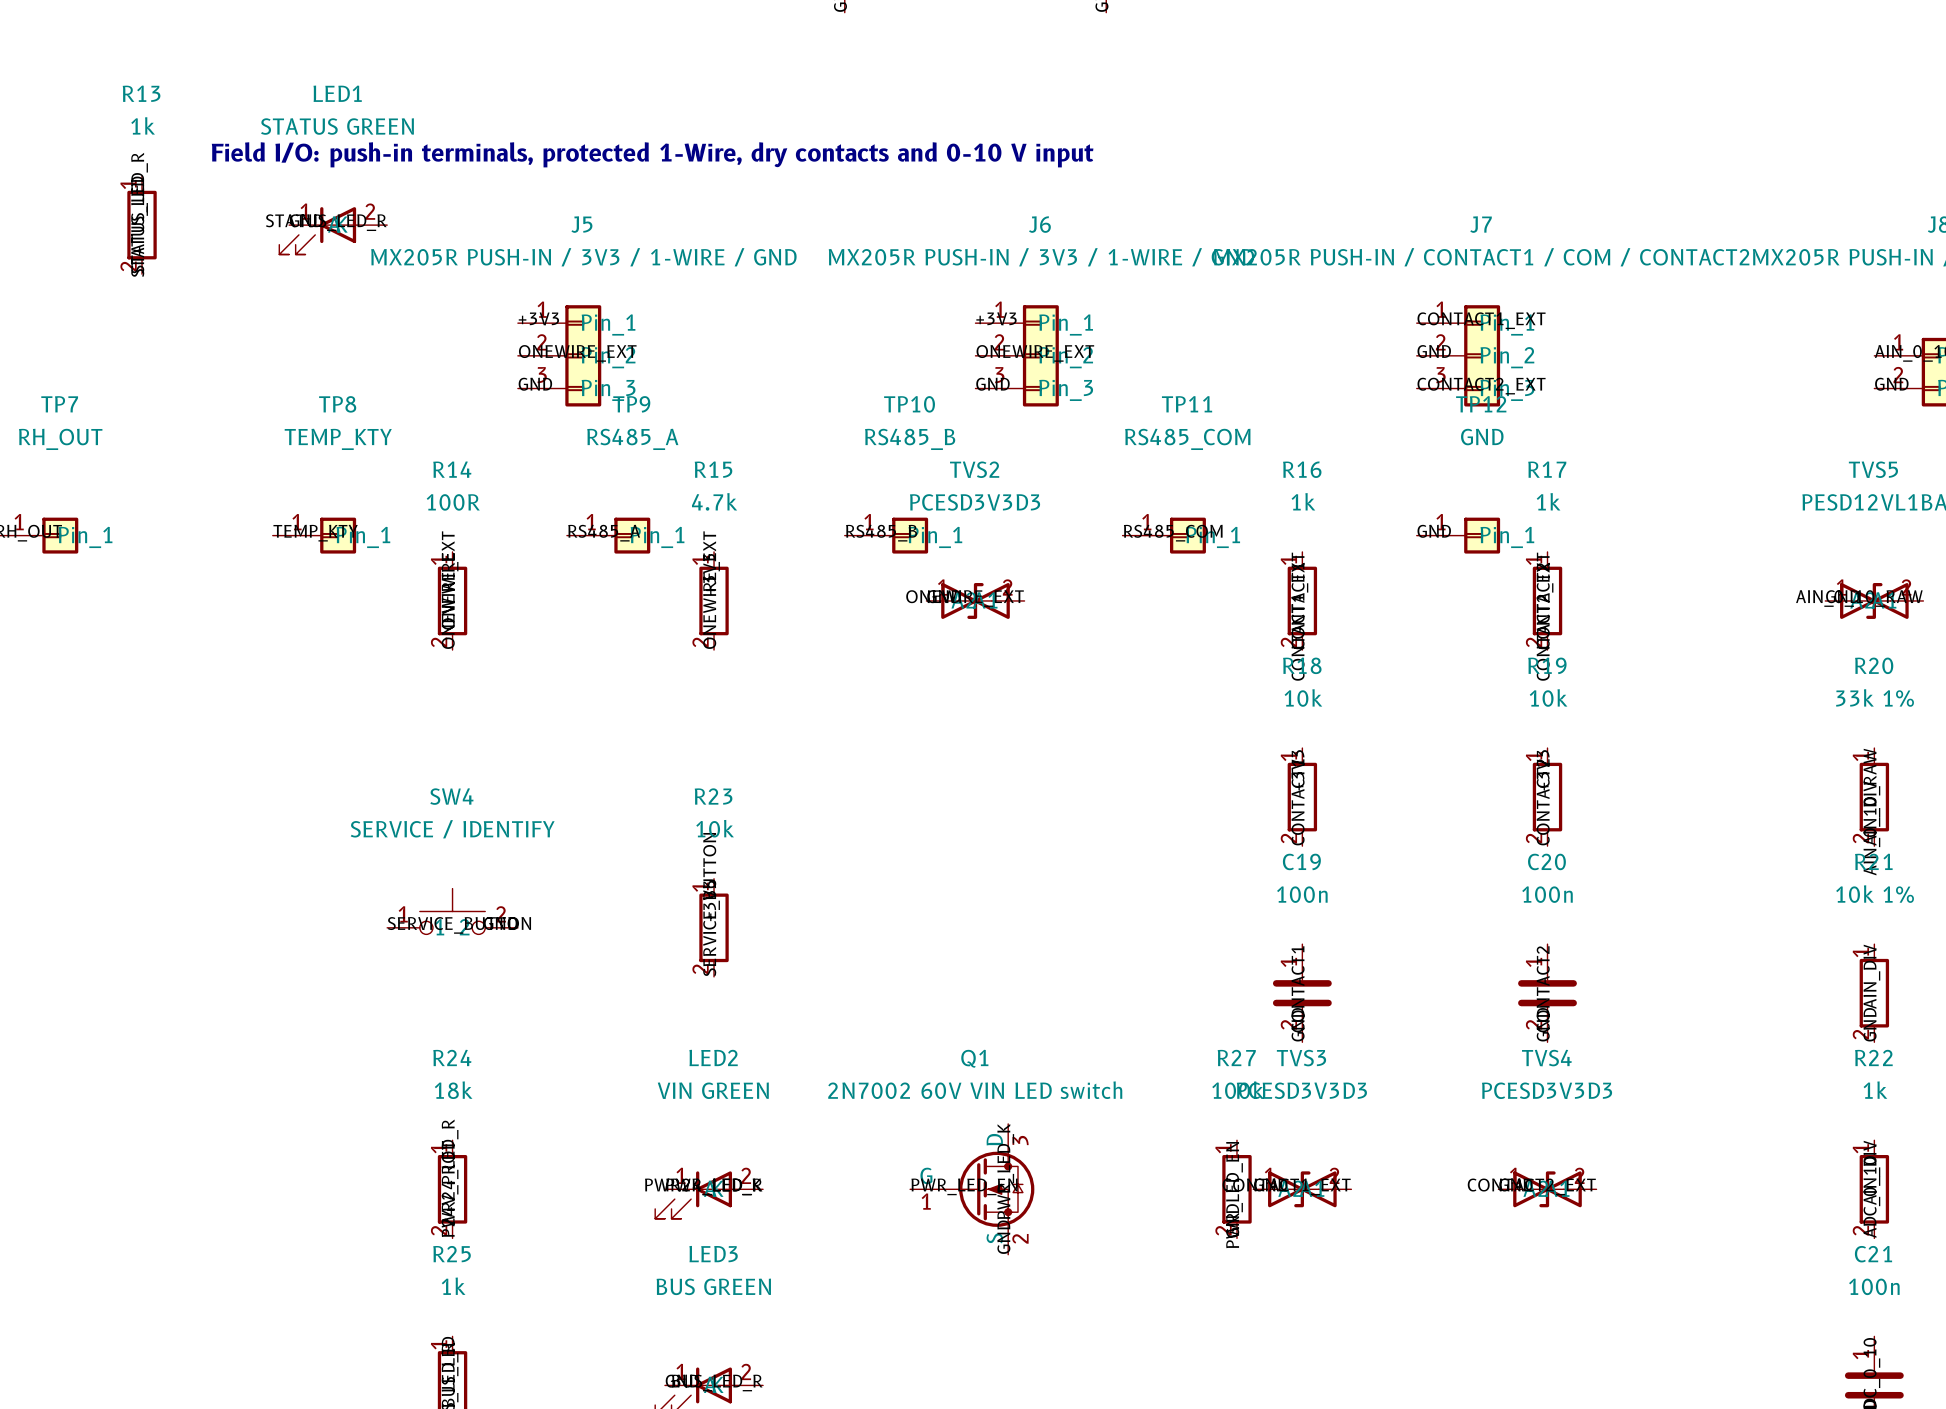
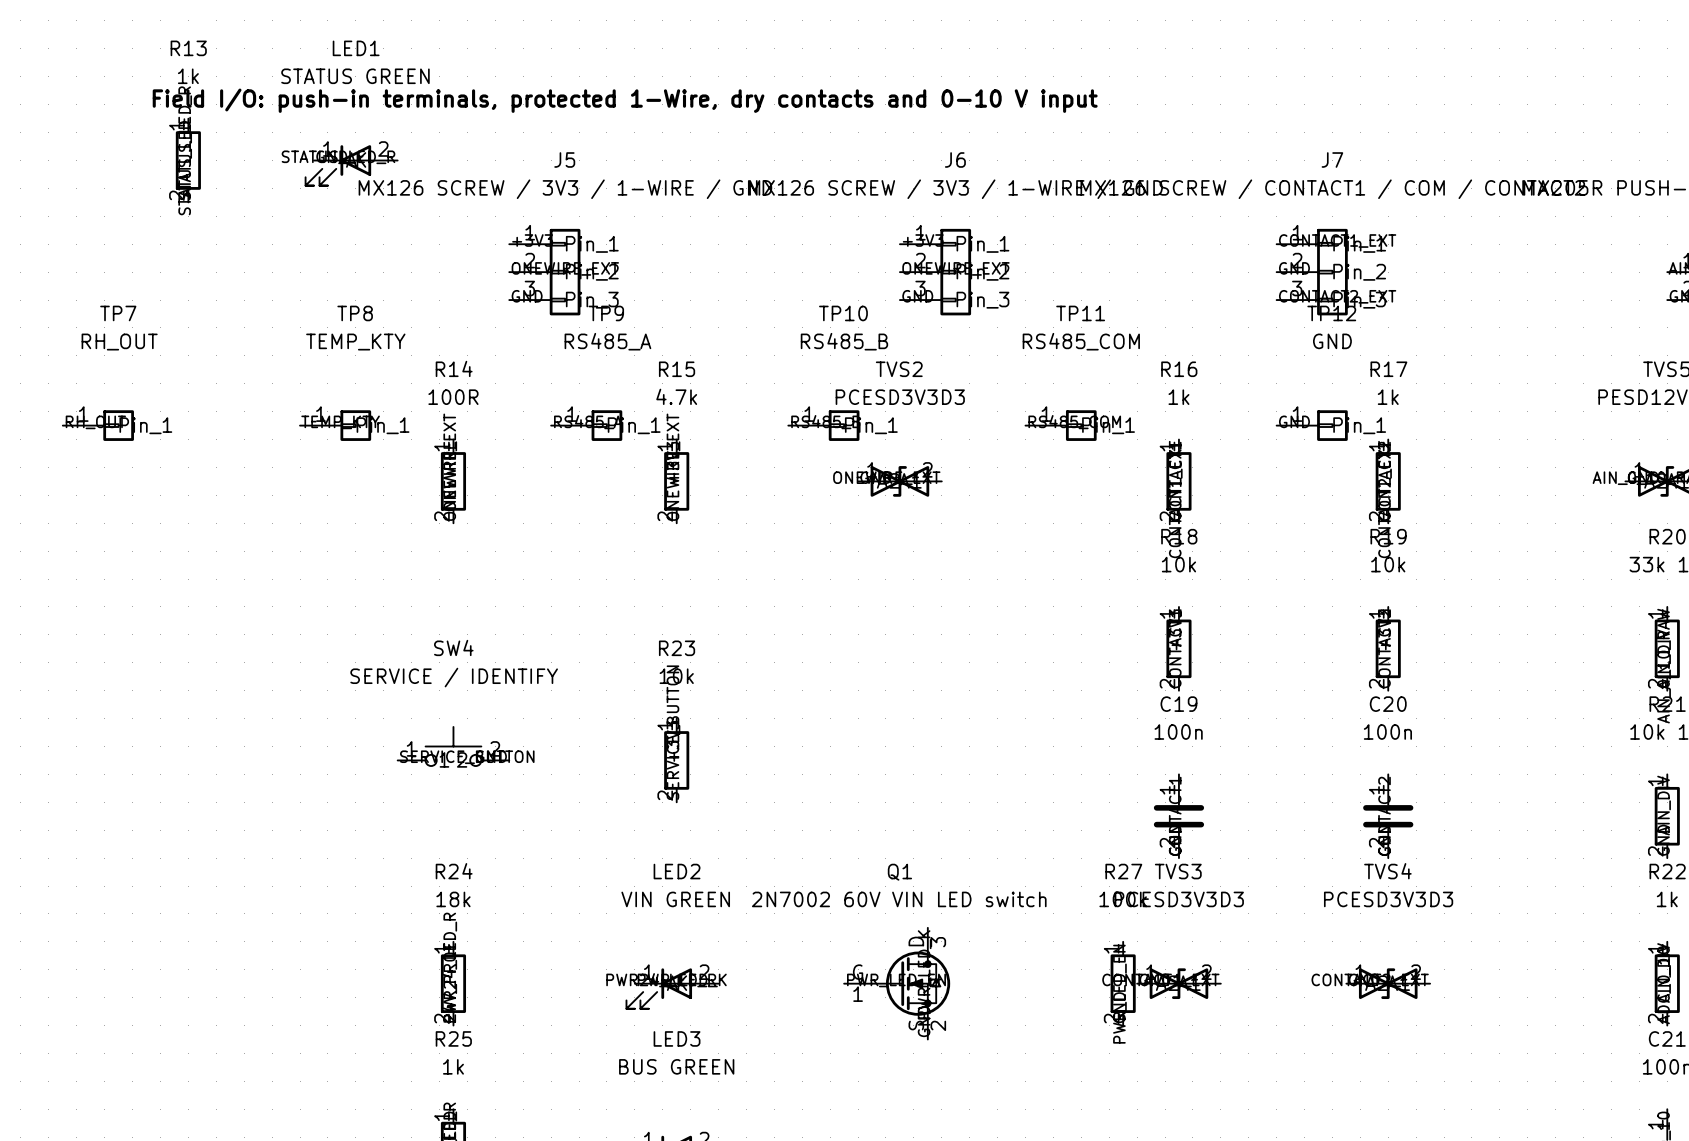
J5 value: MX205R PUSH-IN / 3V3 / 1-WIRE / GND (583, 257) -> MX126 SCREW / 3V3 / 1-WIRE / GND (565, 189)
J6 value: MX205R PUSH-IN / 3V3 / 1-WIRE / GND (1041, 257) -> MX126 SCREW / 3V3 / 1-WIRE / GND (956, 189)
J7 value: MX205R PUSH-IN / CONTACT1 / COM / CONTACT2 (1481, 257) -> MX126 SCREW / CONTACT1 / COM / CONTACT2 (1332, 189)

